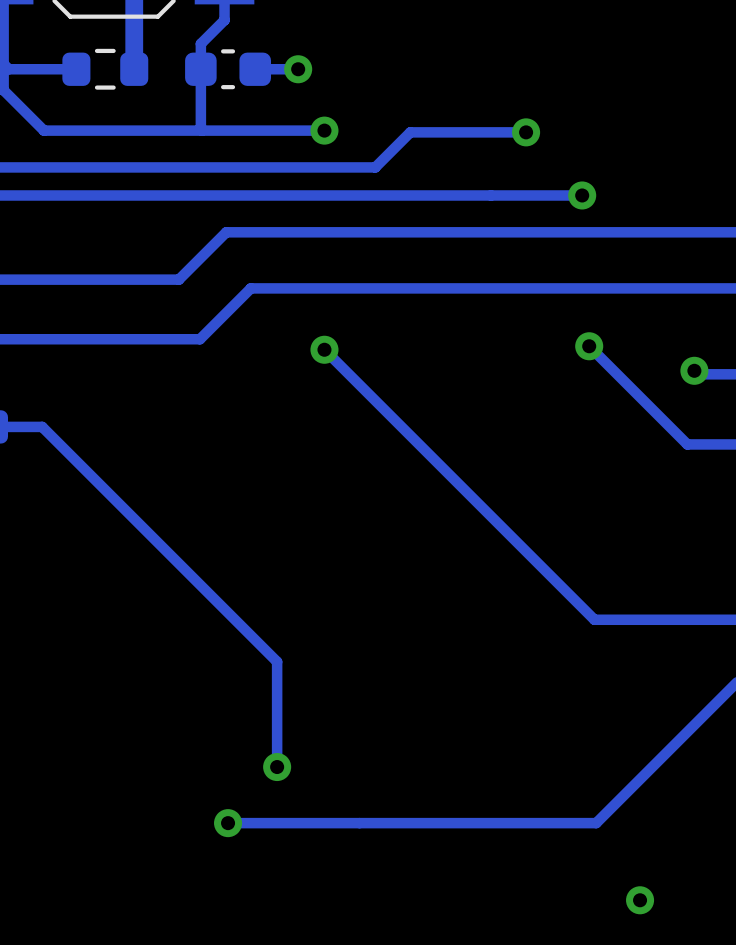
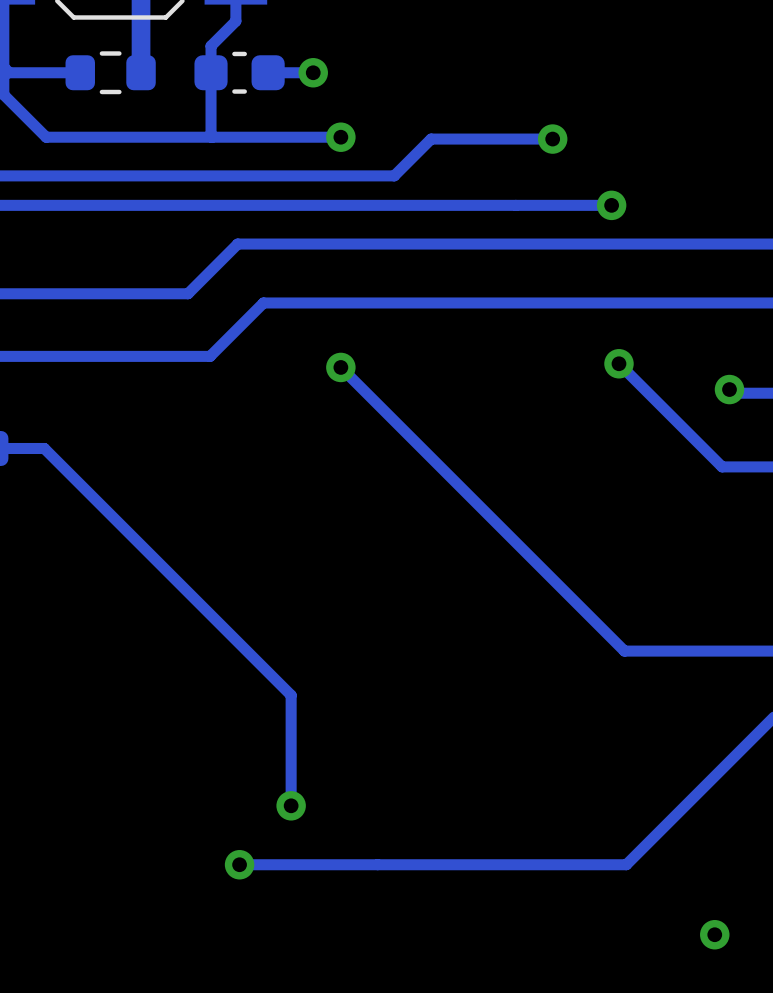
via position: (640, 900) -> (714, 934)

